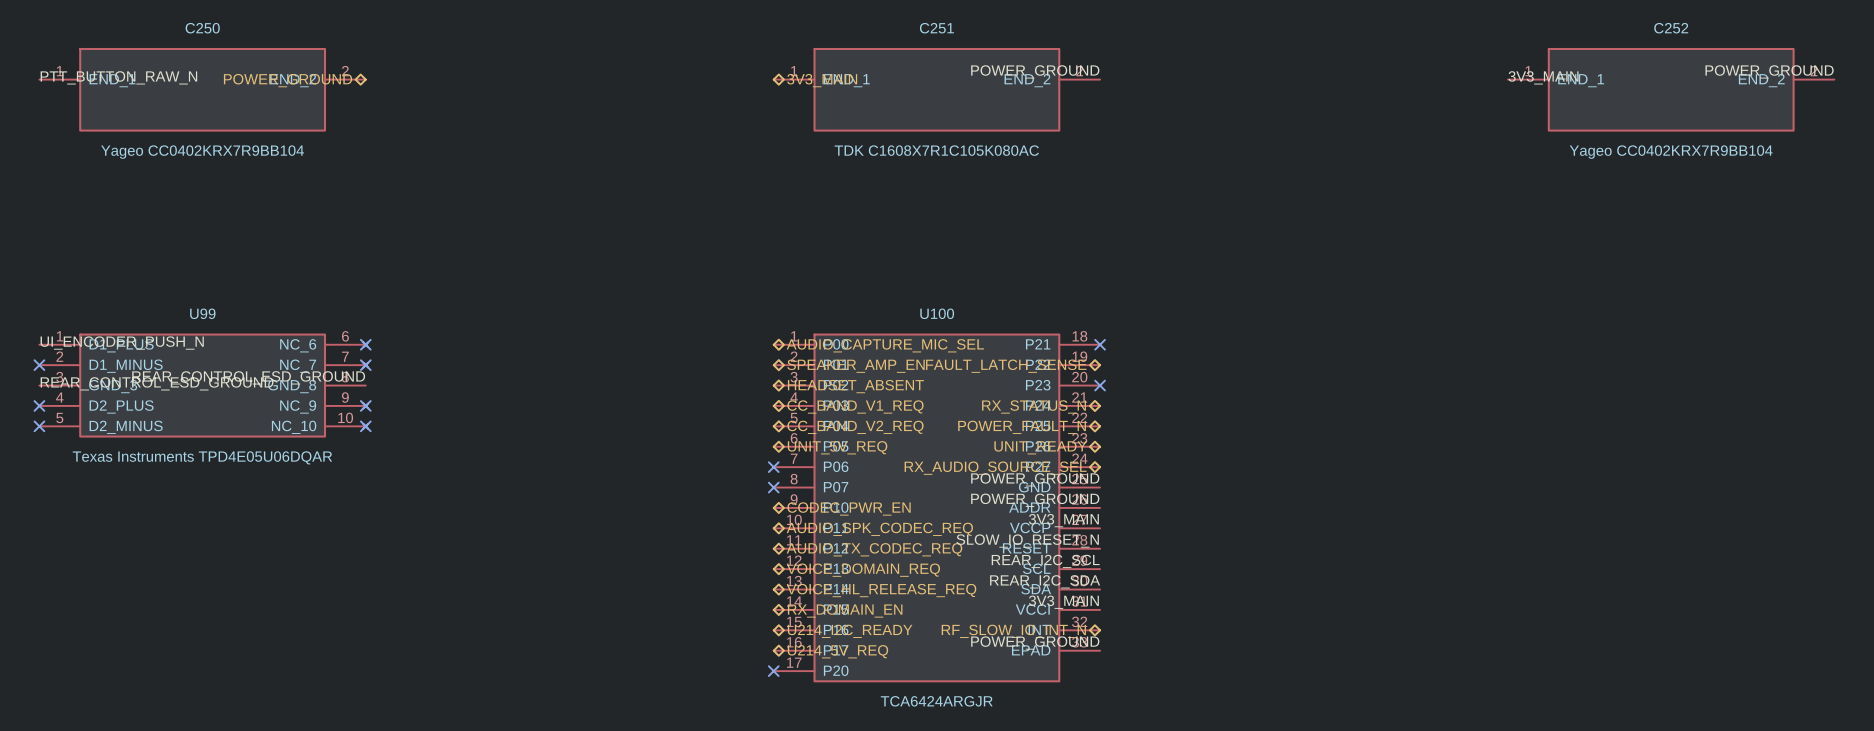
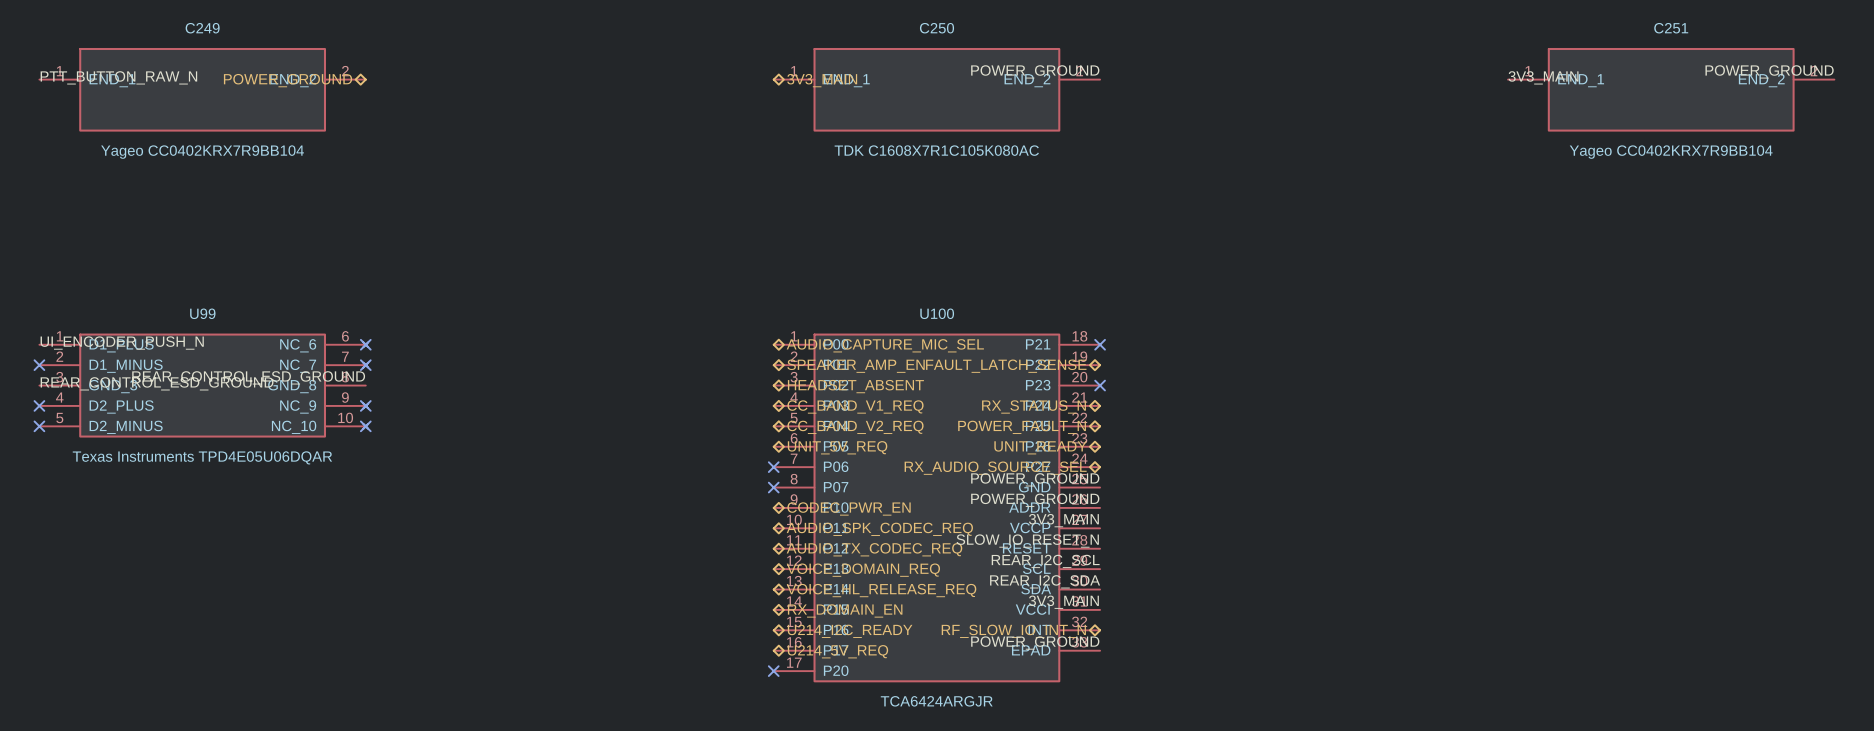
C250 name: C250 (202, 28) -> C249 (202, 28)
C251 name: C251 (936, 28) -> C250 (936, 28)
C252 name: C252 (1671, 28) -> C251 (1671, 28)

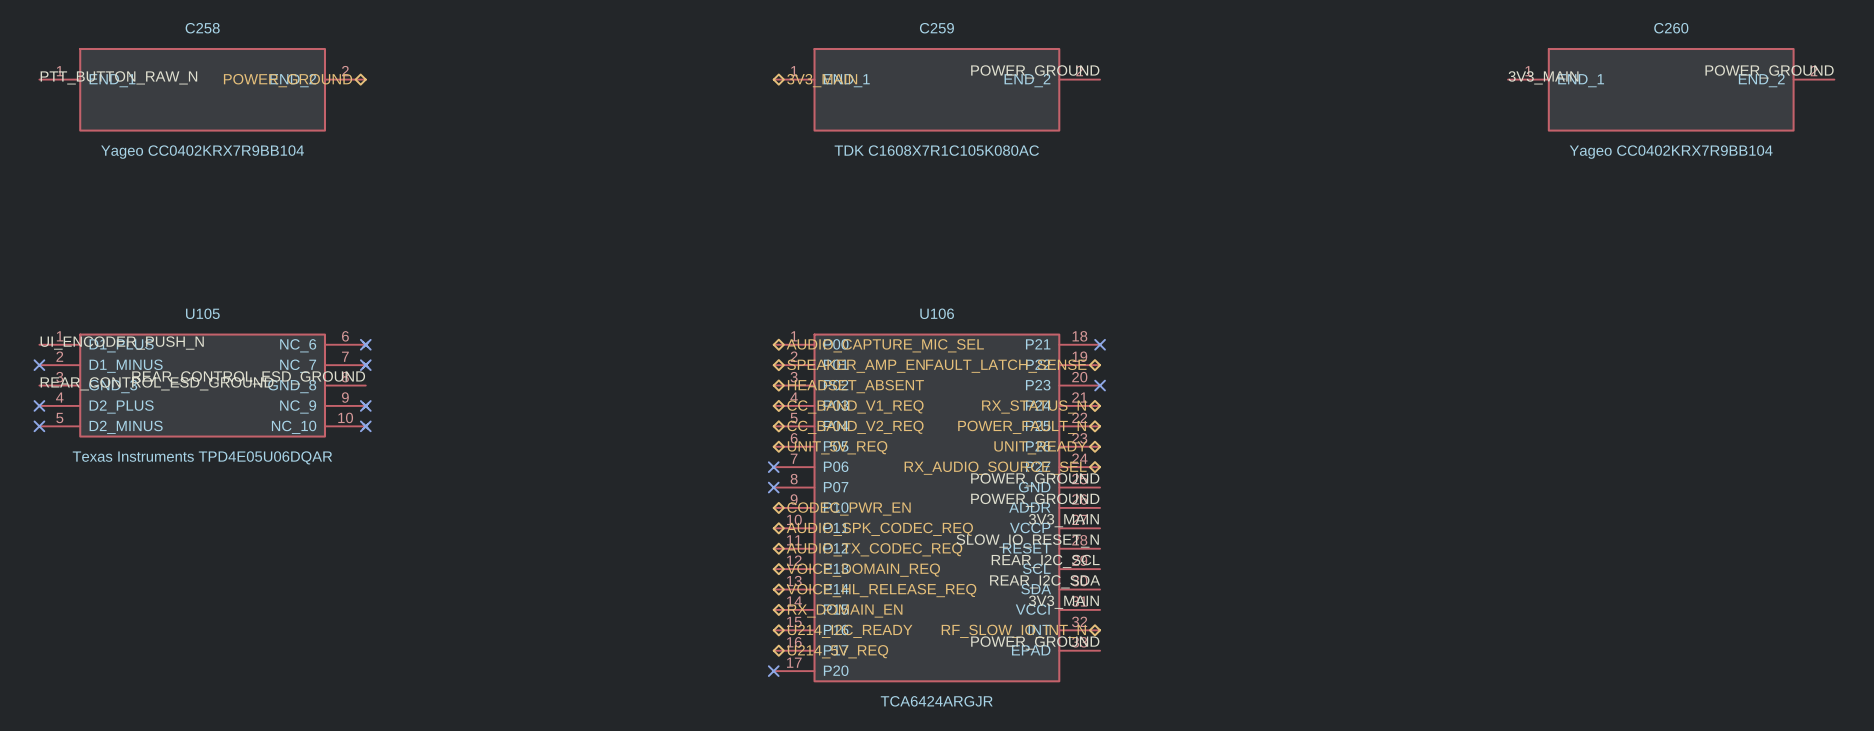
C249 name: C249 (202, 28) -> C258 (202, 28)
C250 name: C250 (936, 28) -> C259 (936, 28)
C251 name: C251 (1671, 28) -> C260 (1671, 28)
U99 name: U99 (202, 313) -> U105 (202, 313)
U100 name: U100 (937, 313) -> U106 (937, 313)

